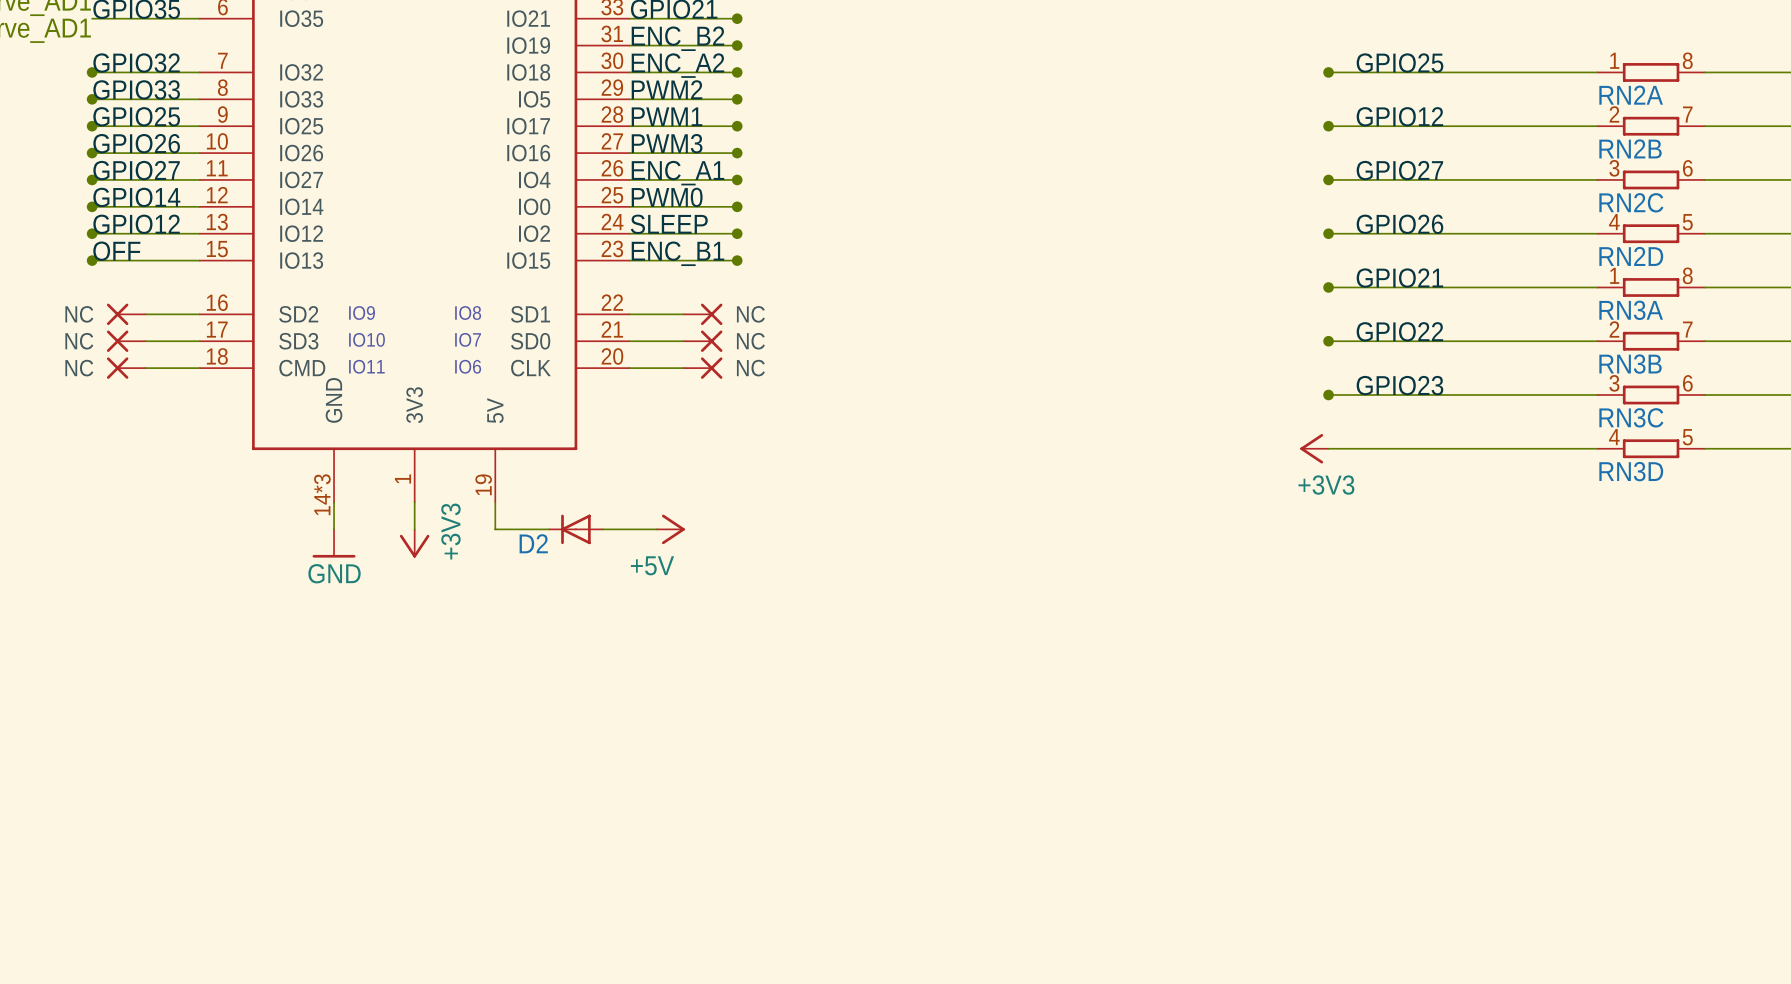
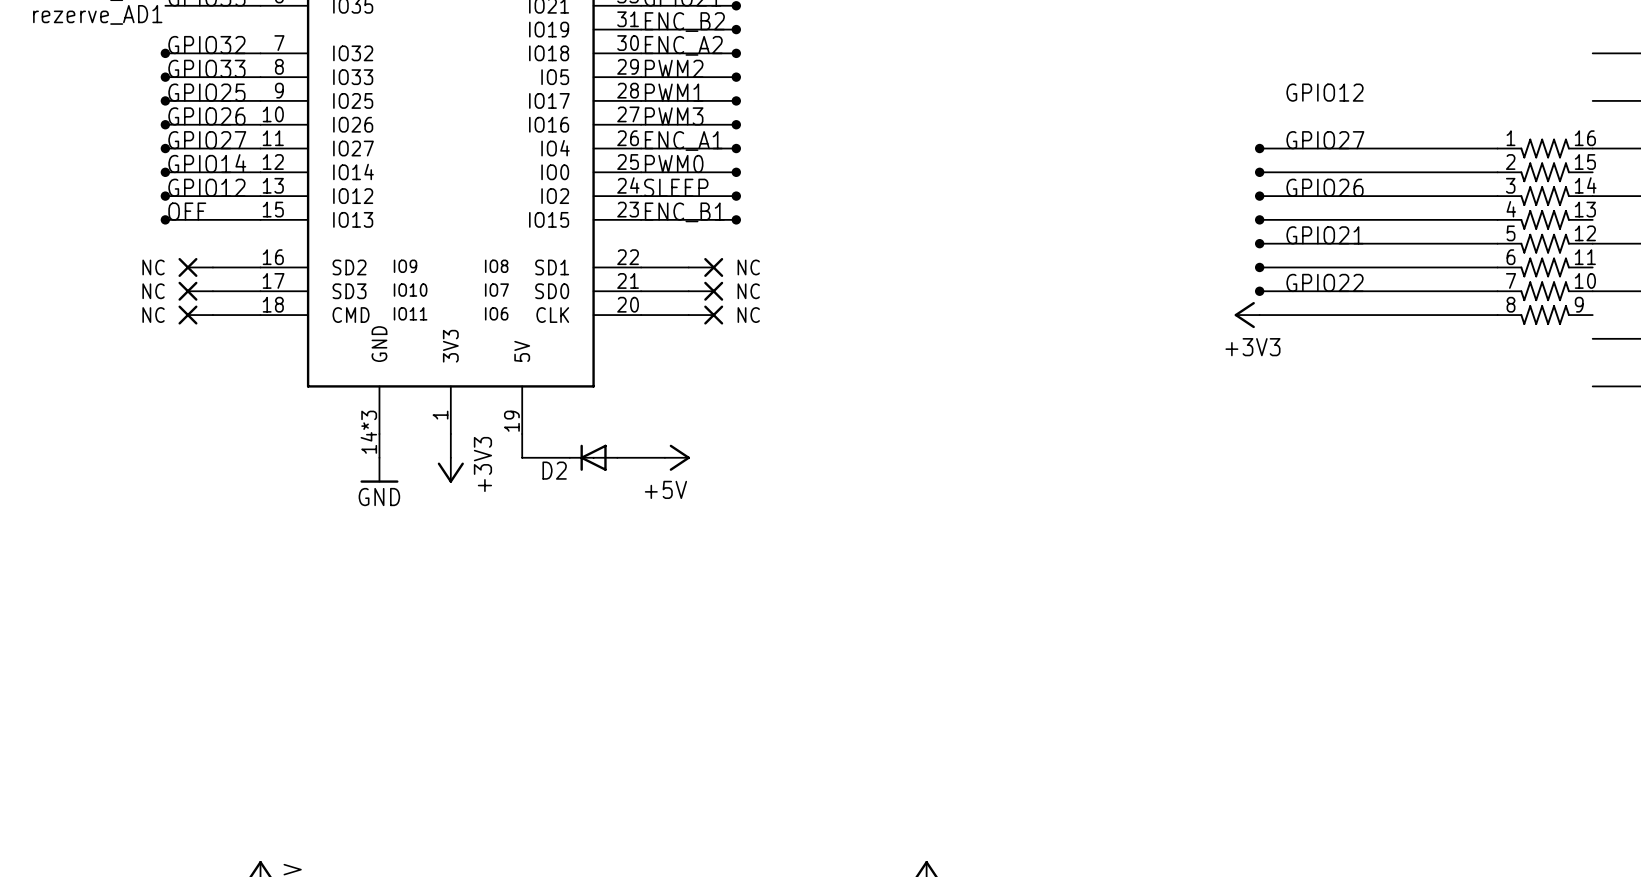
label: GPIO25 (1399, 63) -> none
wire: (1328, 72) (1597, 72) -> (1259, 219) (1497, 219)
junction: (1328, 72) -> none
RN2A: (1651, 72) -> none
wire: (1328, 126) (1597, 126) -> (1259, 172) (1497, 172)
junction: (1328, 126) -> none
RN2B: (1651, 126) -> none
RN2C: (1651, 179) -> none
part: none -> (1545, 148)
junction: none -> (1259, 172)
part: none -> (1545, 172)
RN2D: (1651, 233) -> none
part: none -> (1545, 196)
junction: none -> (1259, 219)
part: none -> (1545, 219)
RN3A: (1651, 287) -> none
part: none -> (1545, 243)
junction: none -> (1259, 267)
part: none -> (1545, 267)
RN3B: (1651, 341) -> none
part: none -> (1545, 291)
part: none -> (1545, 315)
label: GPIO23 (1399, 385) -> none
wire: (1328, 394) (1597, 394) -> (1259, 267) (1497, 267)
junction: (1328, 394) -> none
RN3C: (1651, 394) -> none
power symbol position: +3V3 (1314, 448) -> +3V3 (1247, 315)
wire: (1328, 448) (1597, 448) -> (1259, 315) (1497, 315)
RN3D: (1651, 448) -> none

